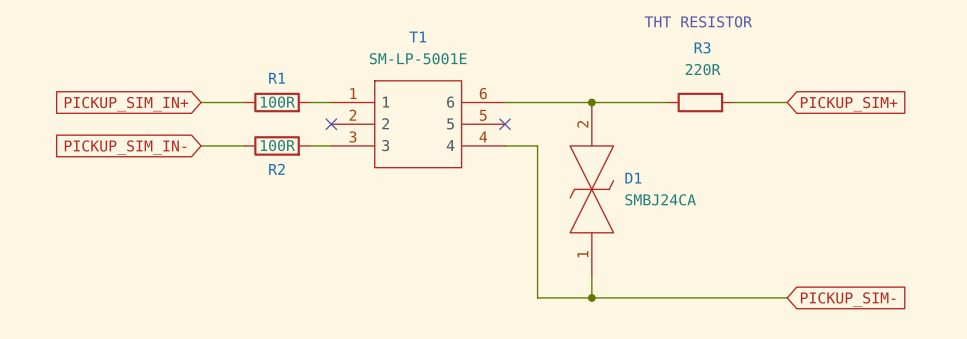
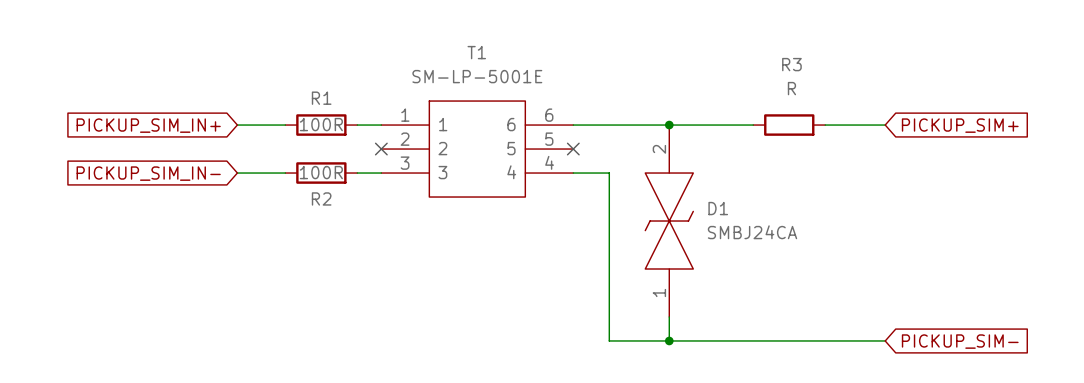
text: THT RESISTOR (698, 21) -> none
R3 value: 220R (703, 69) -> R (791, 88)

